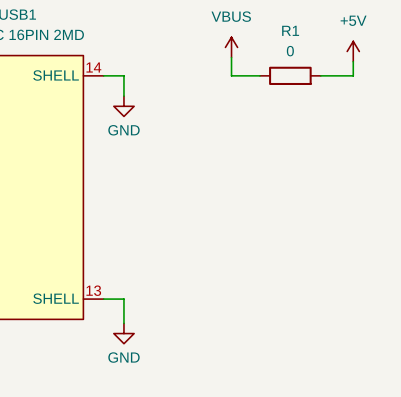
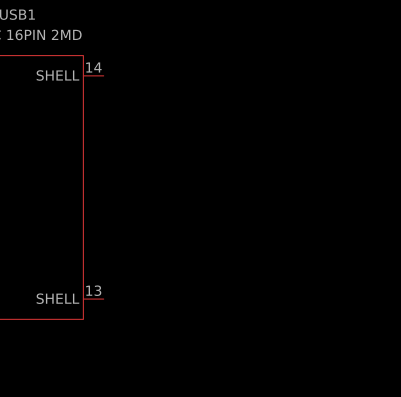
power symbol: VBUS (231, 47) -> none
power symbol: +5V (353, 51) -> none
wire: (231, 57) (231, 75) (259, 75) -> none
wire: (353, 61) (353, 75) (320, 75) -> none
wire: (103, 75) (123, 75) (123, 96) -> none
R1: 0 (290, 75) -> none
power symbol: GND (123, 106) -> none
wire: (103, 299) (123, 299) (123, 323) -> none
power symbol: GND (123, 333) -> none

